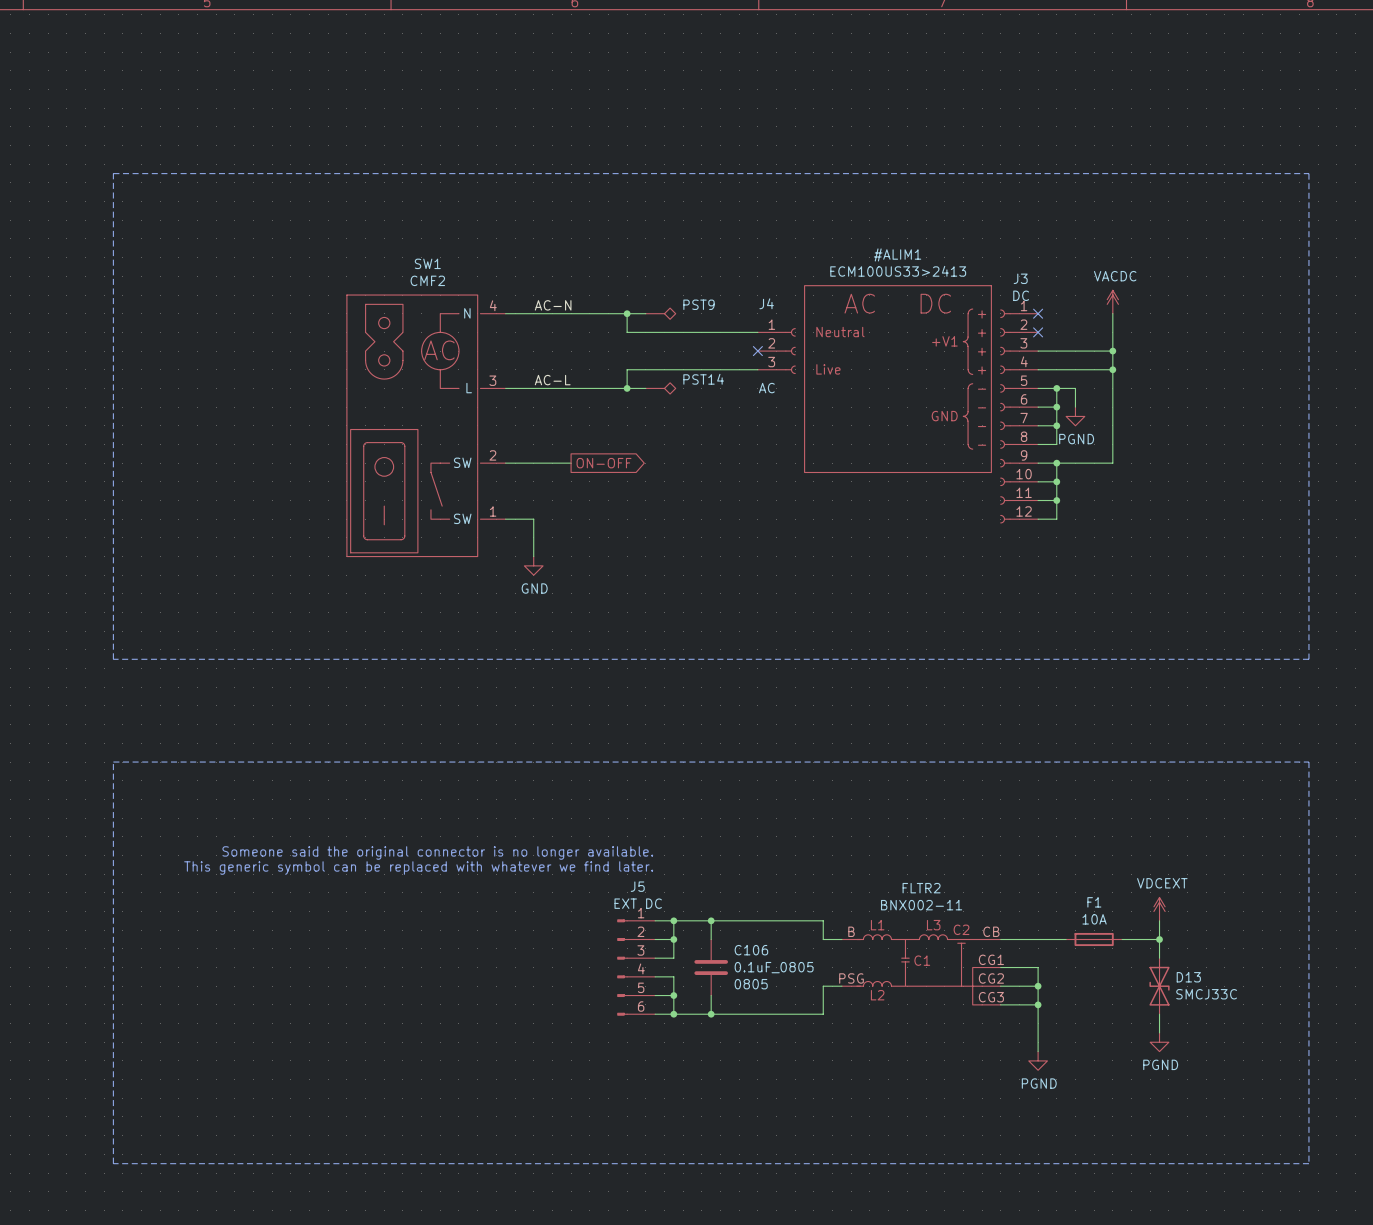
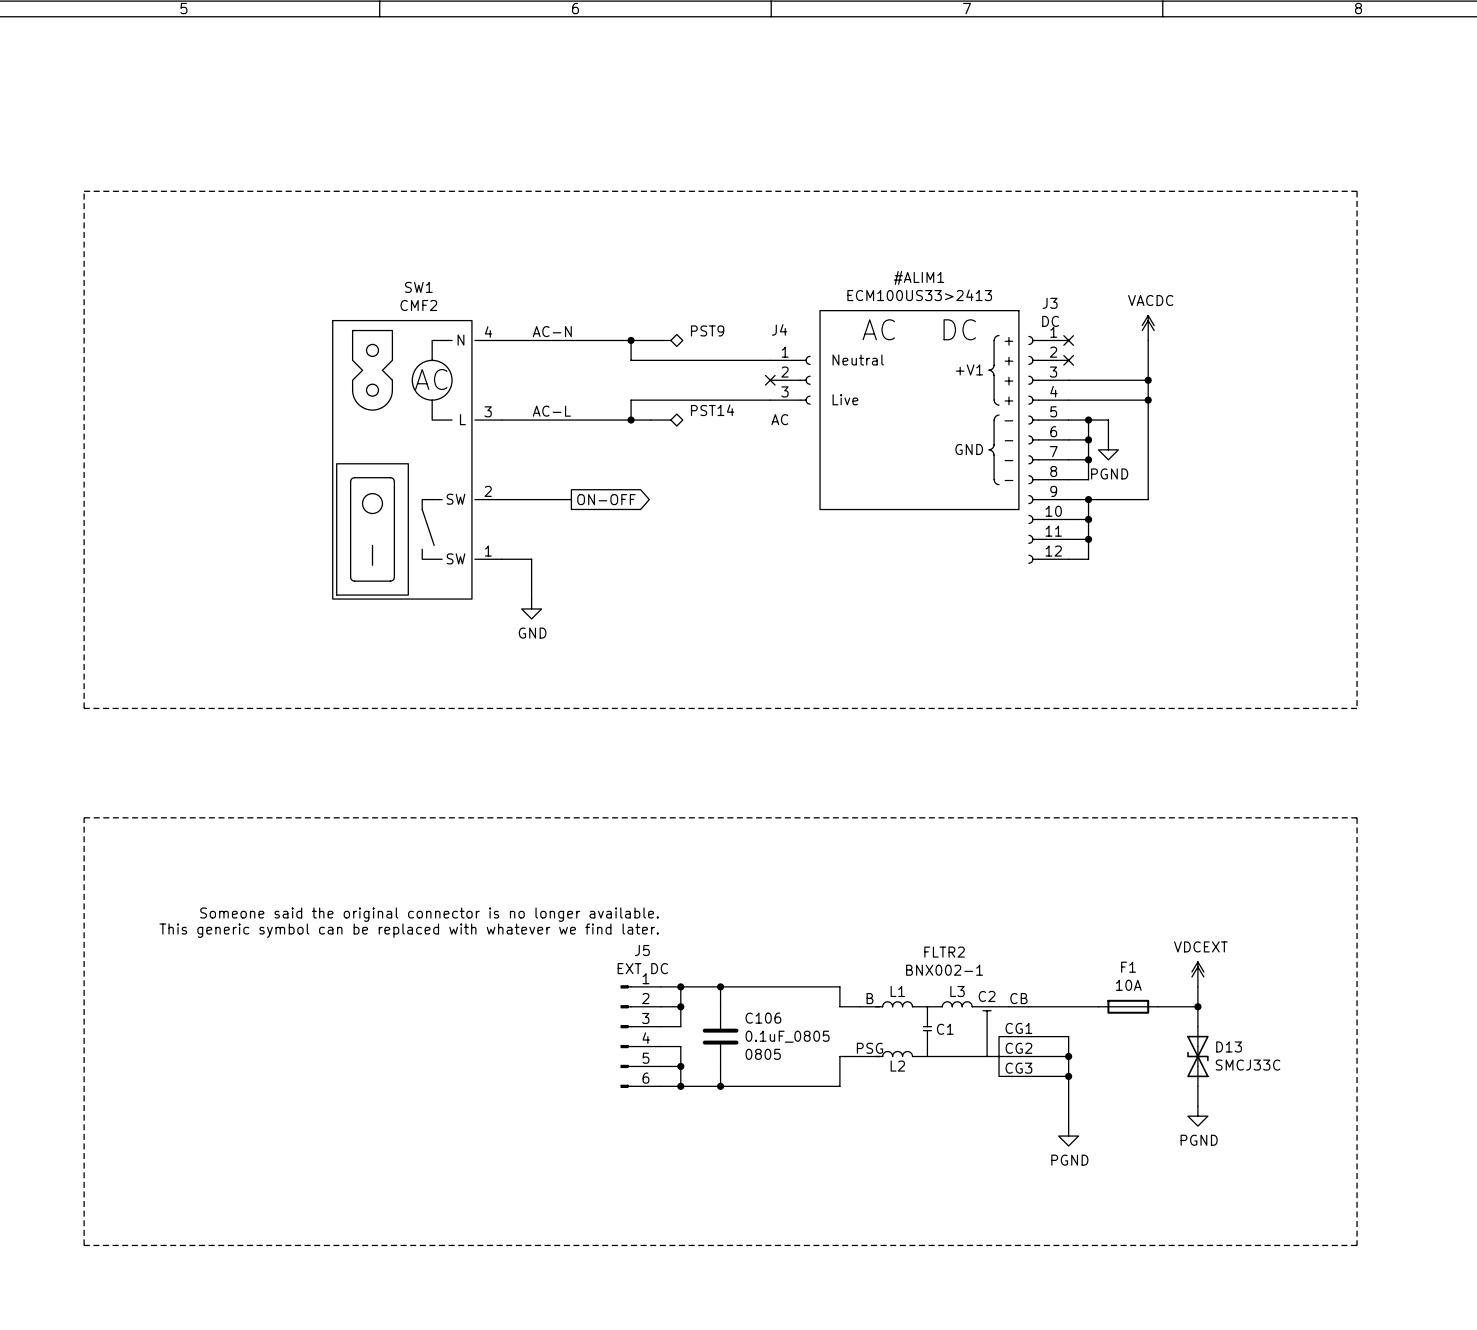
FLTR2 value: BNX002-11 (921, 905) -> BNX002-1 (944, 970)

